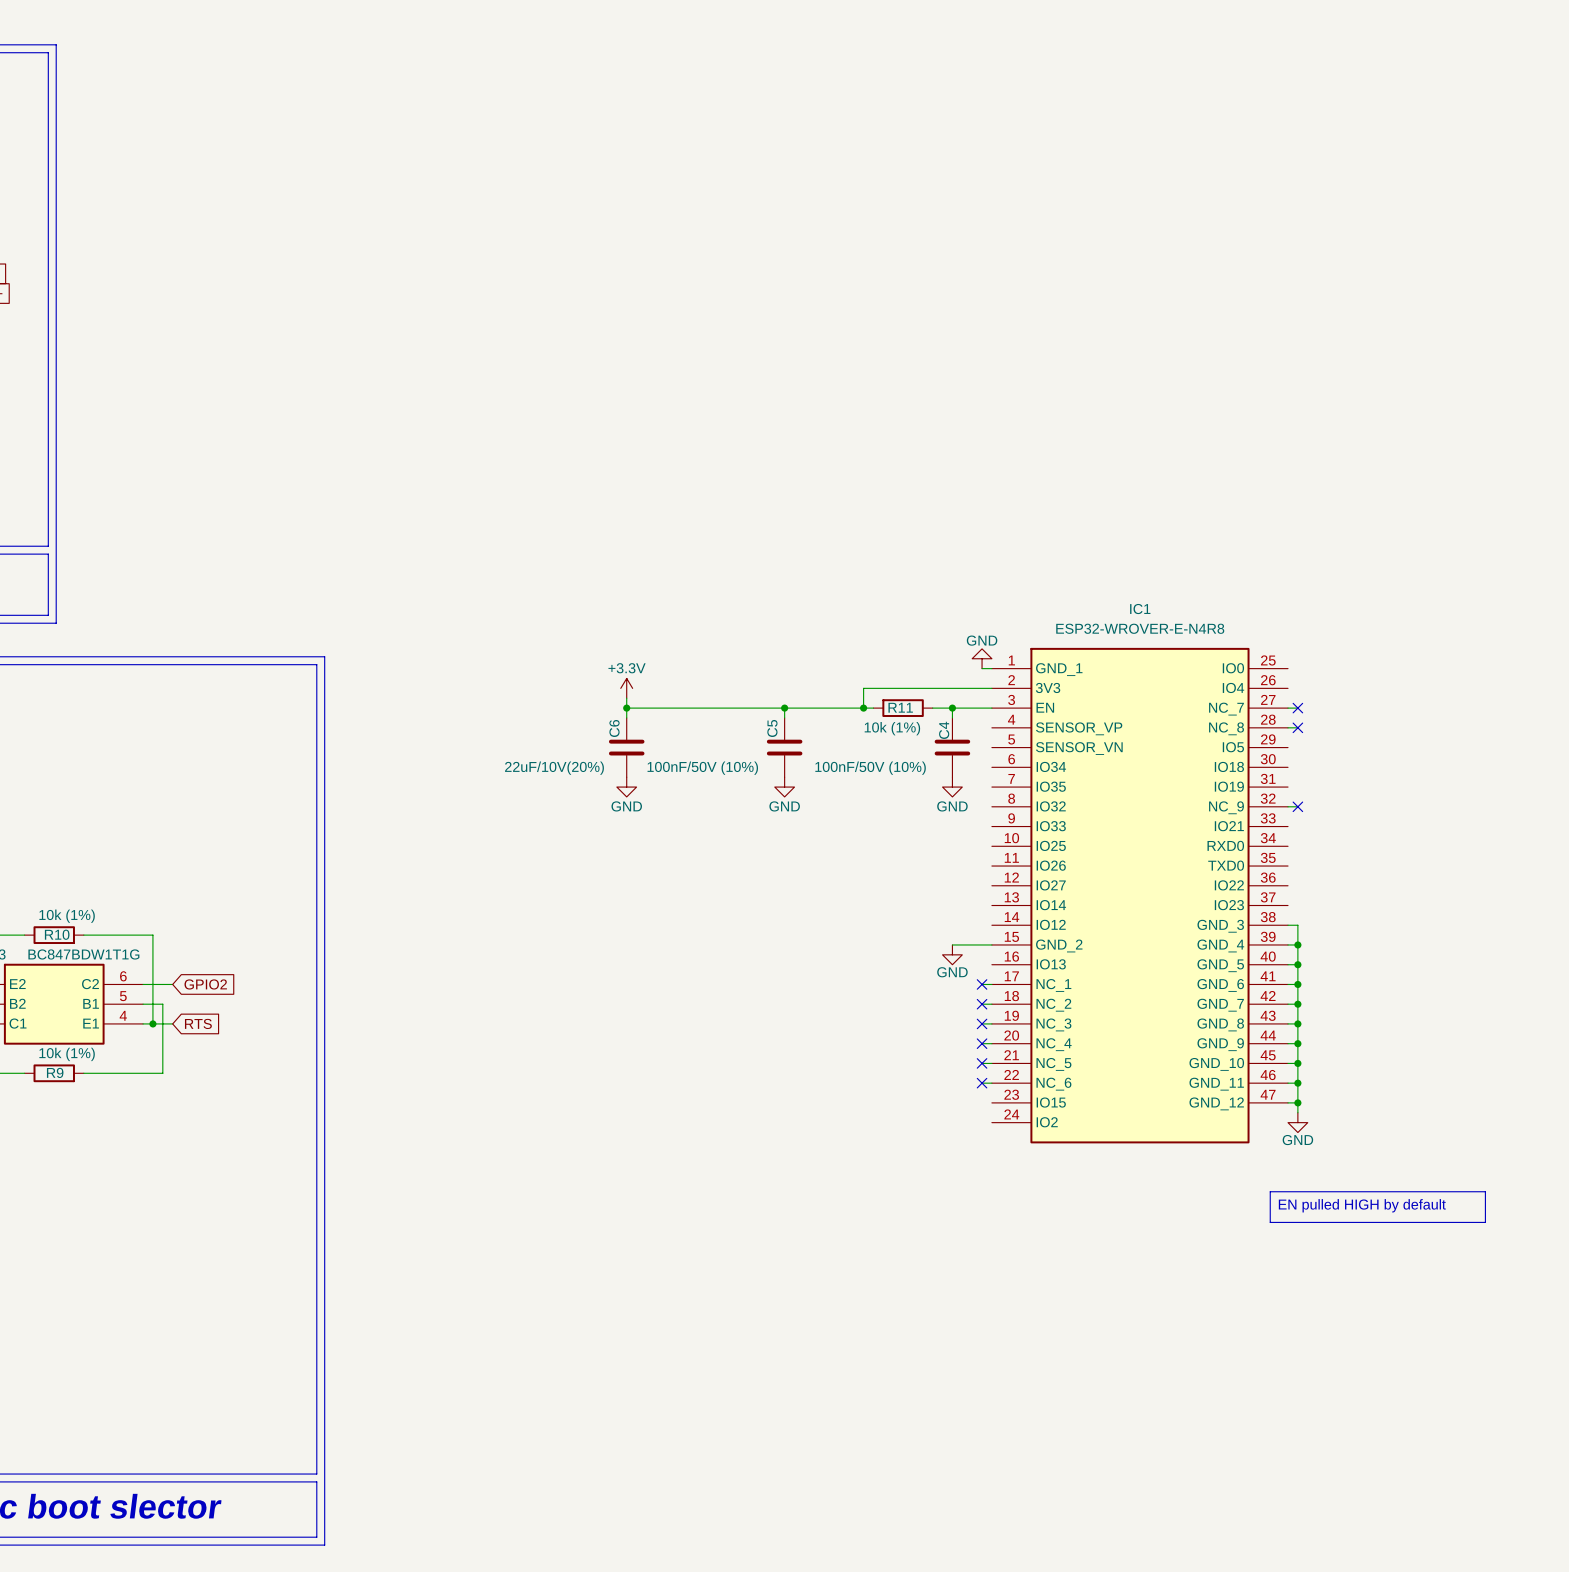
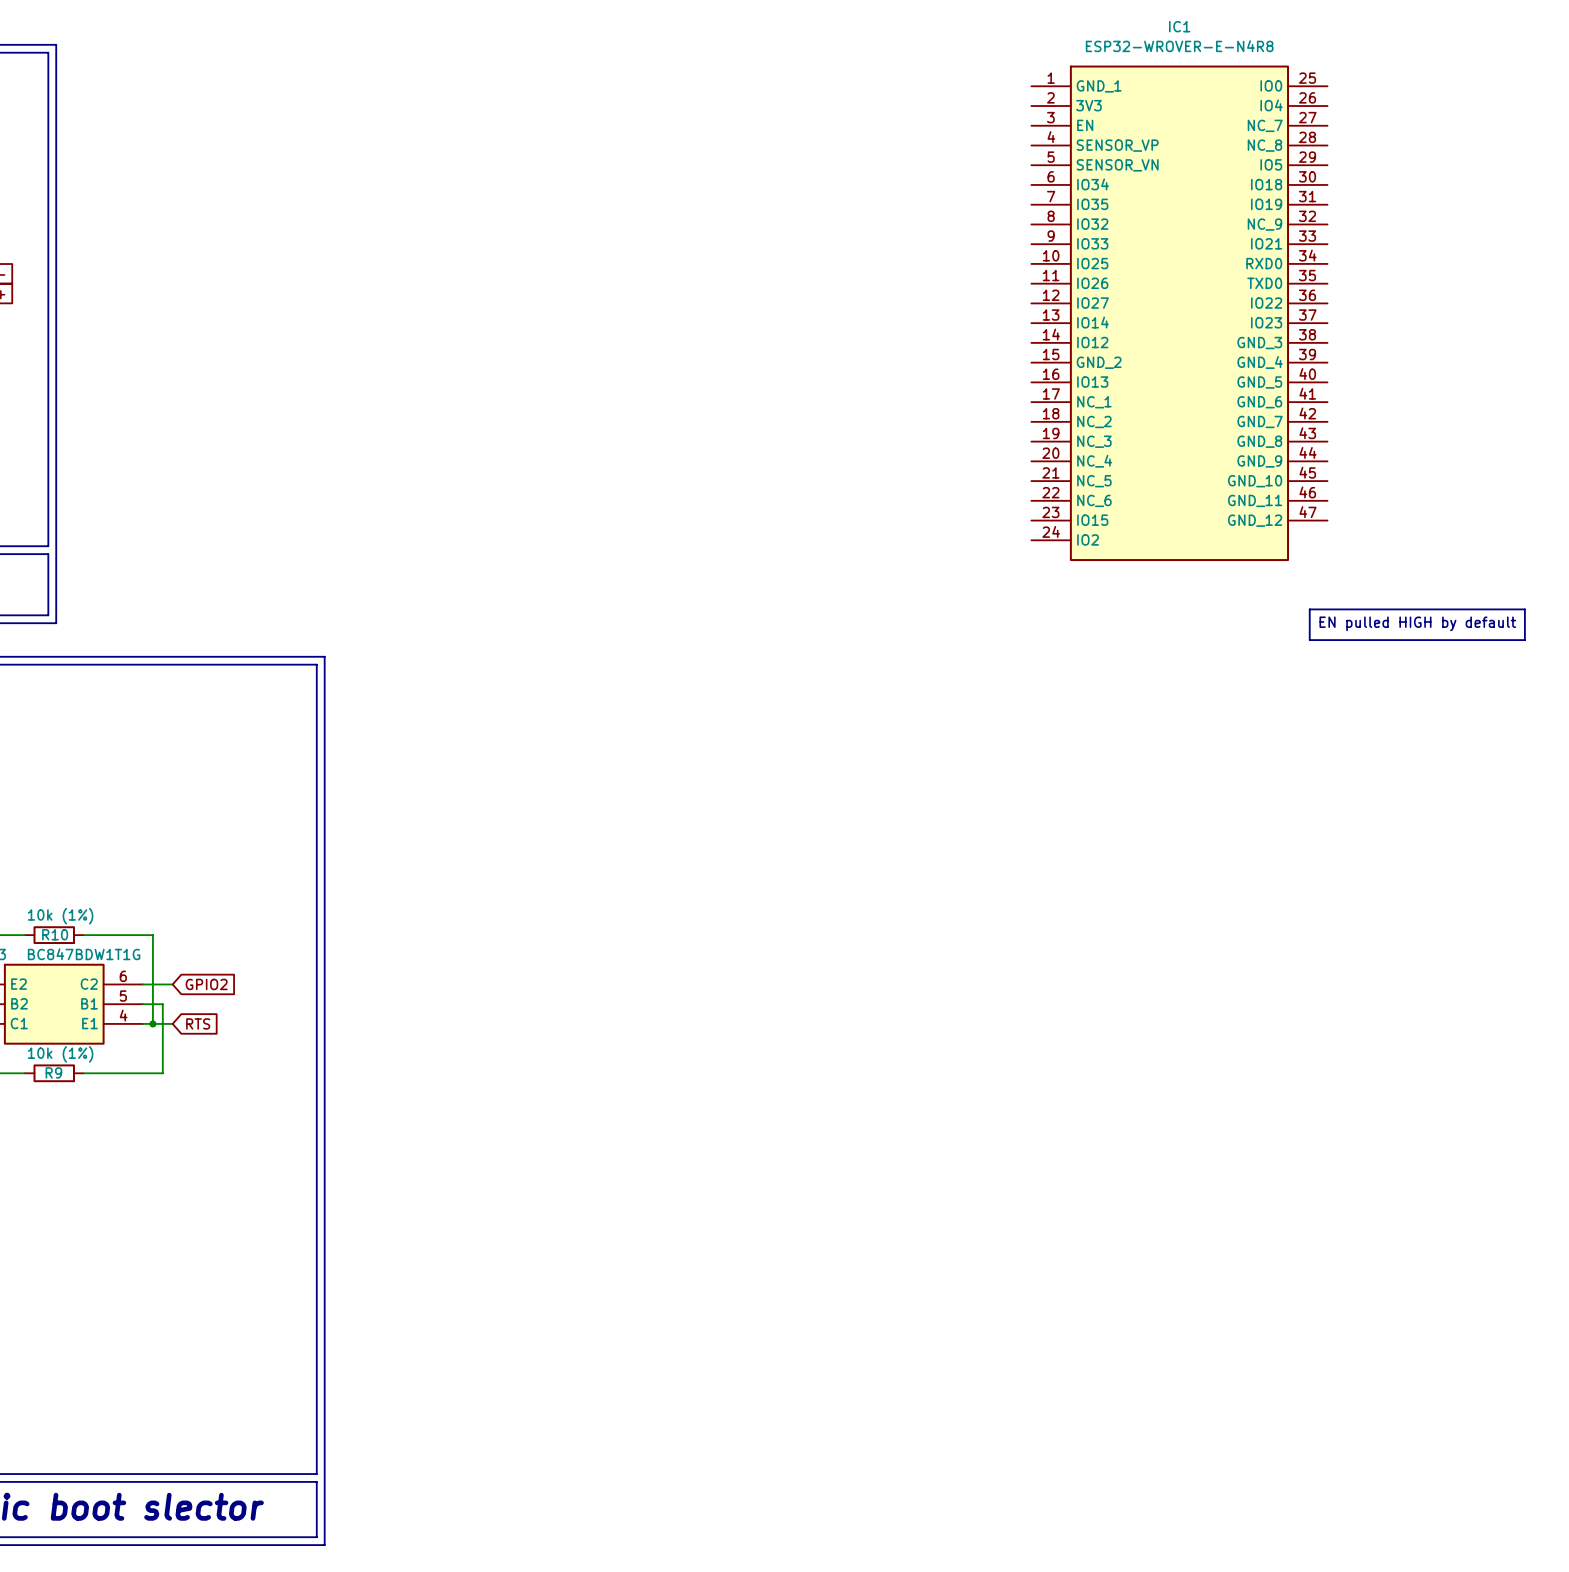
line: none -> (1309, 609) (1524, 609) (1524, 640) (1309, 640) (1309, 609)
text: none -> EN pulled HIGH by default (1417, 623)
power symbol: GND (982, 658) -> none
wire: (982, 668) (991, 668) -> none
power symbol: +3.3V (626, 688) -> none
wire: (991, 688) (863, 688) (863, 708) -> none
wire: (626, 698) (626, 717) -> none
wire: (626, 708) (873, 708) -> none
junction: (626, 708) -> none
wire: (784, 708) (784, 717) -> none
junction: (784, 708) -> none
junction: (863, 708) -> none
R11: 10k (1%) (903, 708) -> none
wire: (932, 708) (991, 708) -> none
wire: (952, 708) (952, 717) -> none
junction: (952, 708) -> none
wire: (1288, 708) (1297, 708) -> none
no-connect mark: (1297, 708) -> none
wire: (1288, 727) (1297, 727) -> none
no-connect mark: (1297, 727) -> none
C6: 22uF/10V(20%) (626, 747) -> none
C5: 100nF/50V (10%) (784, 747) -> none
C4: 100nF/50V (10%) (952, 747) -> none
power symbol: GND (626, 787) -> none
power symbol: GND (784, 787) -> none
power symbol: GND (952, 787) -> none
wire: (1288, 806) (1297, 806) -> none
no-connect mark: (1297, 806) -> none
IC1 position: (1139, 895) -> (1179, 313)
wire: (1288, 925) (1297, 925) (1297, 1112) -> none
wire: (952, 944) (991, 944) -> none
wire: (1288, 944) (1297, 944) -> none
junction: (1297, 944) -> none
power symbol: GND (952, 954) -> none
wire: (1288, 964) (1297, 964) -> none
junction: (1297, 964) -> none
wire: (982, 984) (991, 984) -> none
no-connect mark: (982, 984) -> none
wire: (1288, 984) (1297, 984) -> none
junction: (1297, 984) -> none
wire: (982, 1004) (991, 1004) -> none
no-connect mark: (982, 1004) -> none
wire: (1288, 1004) (1297, 1004) -> none
junction: (1297, 1004) -> none
wire: (982, 1023) (991, 1023) -> none
no-connect mark: (982, 1023) -> none
wire: (1288, 1023) (1297, 1023) -> none
junction: (1297, 1023) -> none
wire: (982, 1043) (991, 1043) -> none
no-connect mark: (982, 1043) -> none
wire: (1288, 1043) (1297, 1043) -> none
junction: (1297, 1043) -> none
wire: (982, 1063) (991, 1063) -> none
no-connect mark: (982, 1063) -> none
wire: (1288, 1063) (1297, 1063) -> none
junction: (1297, 1063) -> none
wire: (982, 1083) (991, 1083) -> none
no-connect mark: (982, 1083) -> none
wire: (1288, 1083) (1297, 1083) -> none
junction: (1297, 1083) -> none
wire: (1288, 1102) (1297, 1102) -> none
junction: (1297, 1102) -> none
power symbol: GND (1297, 1122) -> none
line: (1270, 1191) (1485, 1191) (1485, 1222) (1270, 1222) (1270, 1191) -> none
text: EN pulled HIGH by default (1362, 1205) -> none

